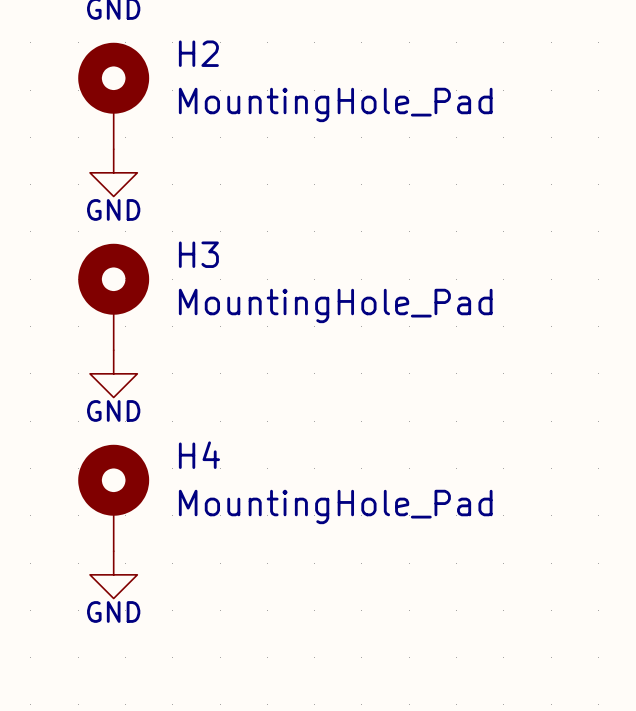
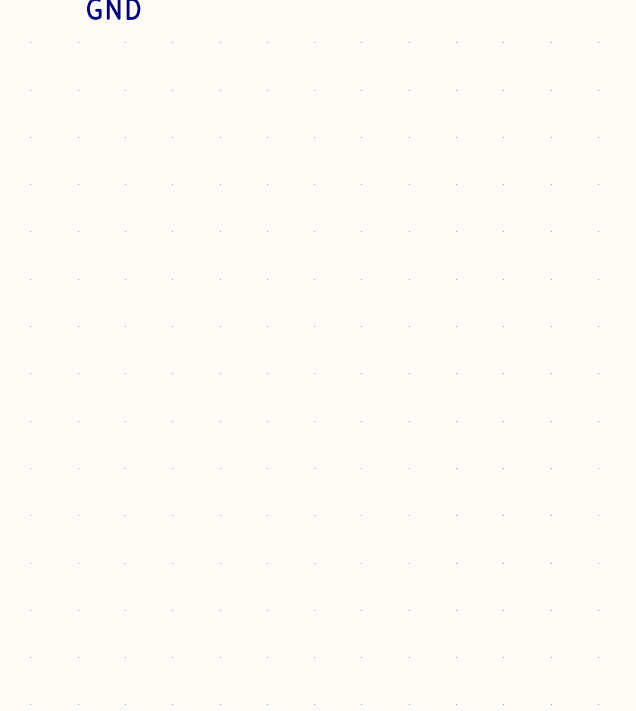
H2: MountingHole_Pad (113, 95) -> none
power symbol: GND (113, 172) -> none
H3: MountingHole_Pad (113, 296) -> none
power symbol: GND (113, 373) -> none
H4: MountingHole_Pad (113, 498) -> none
power symbol: GND (113, 574) -> none

